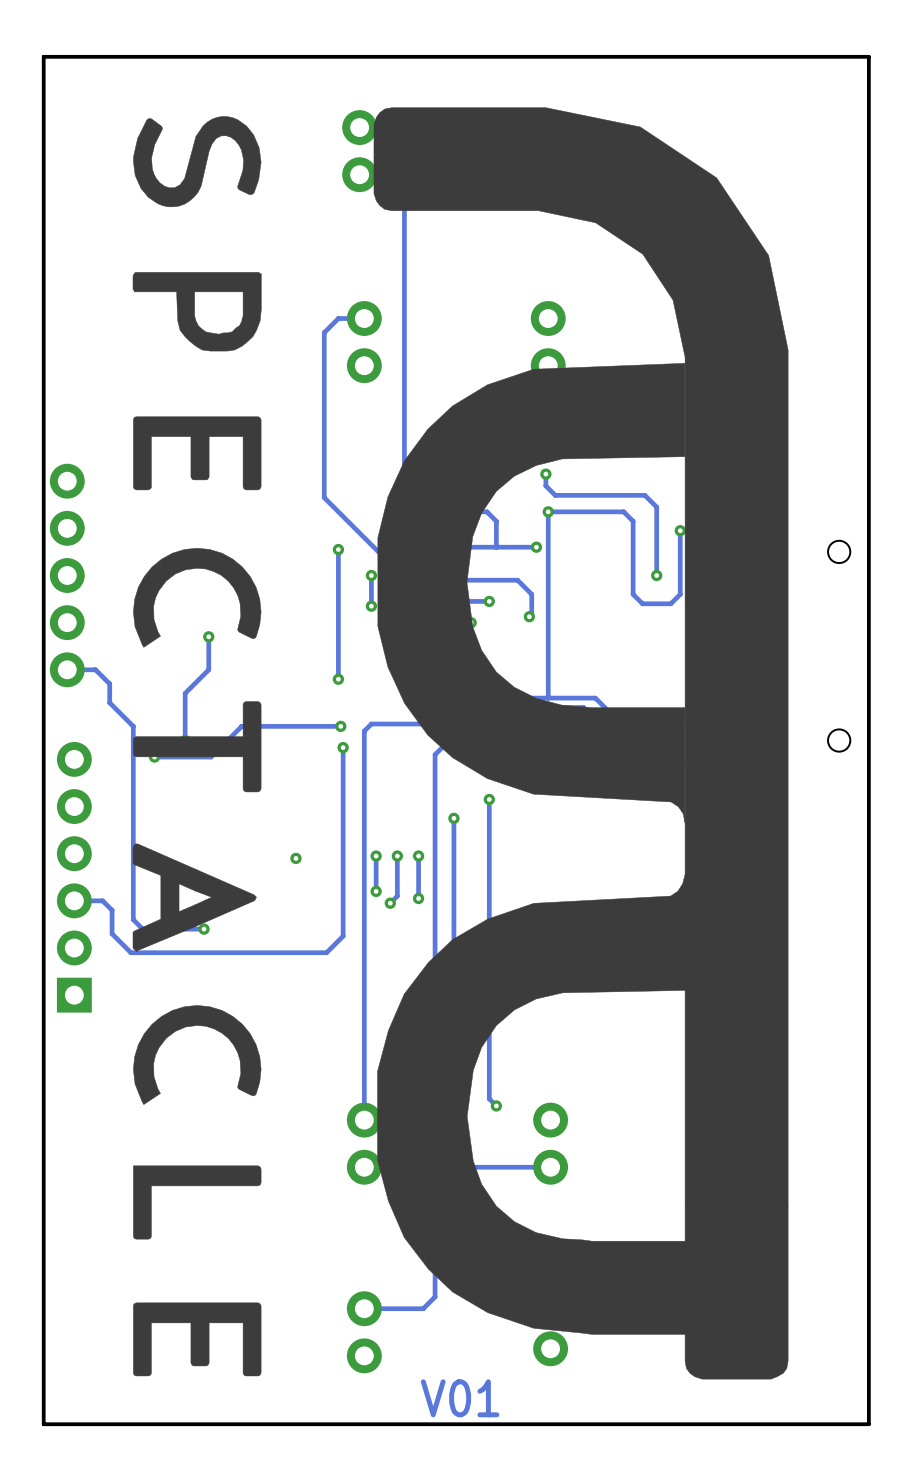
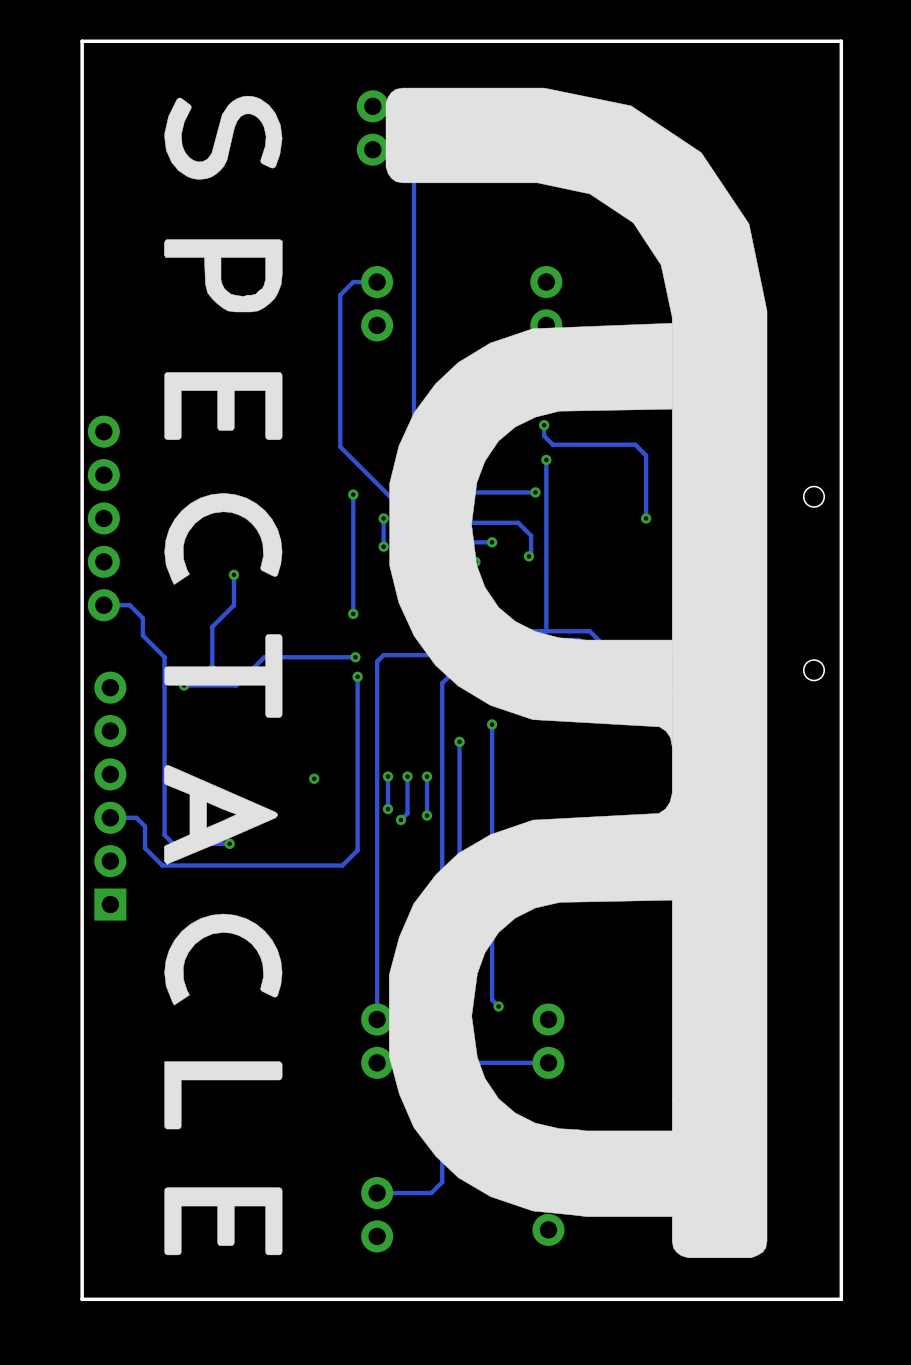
track: (475, 511) (486, 511) (496, 521) (496, 547) -> none
track: (548, 511) (623, 511) (633, 521) (633, 594) (642, 603) (670, 603) (680, 594) (680, 530) -> none
via: (680, 530) -> none
text: V01 (460, 1398) -> none

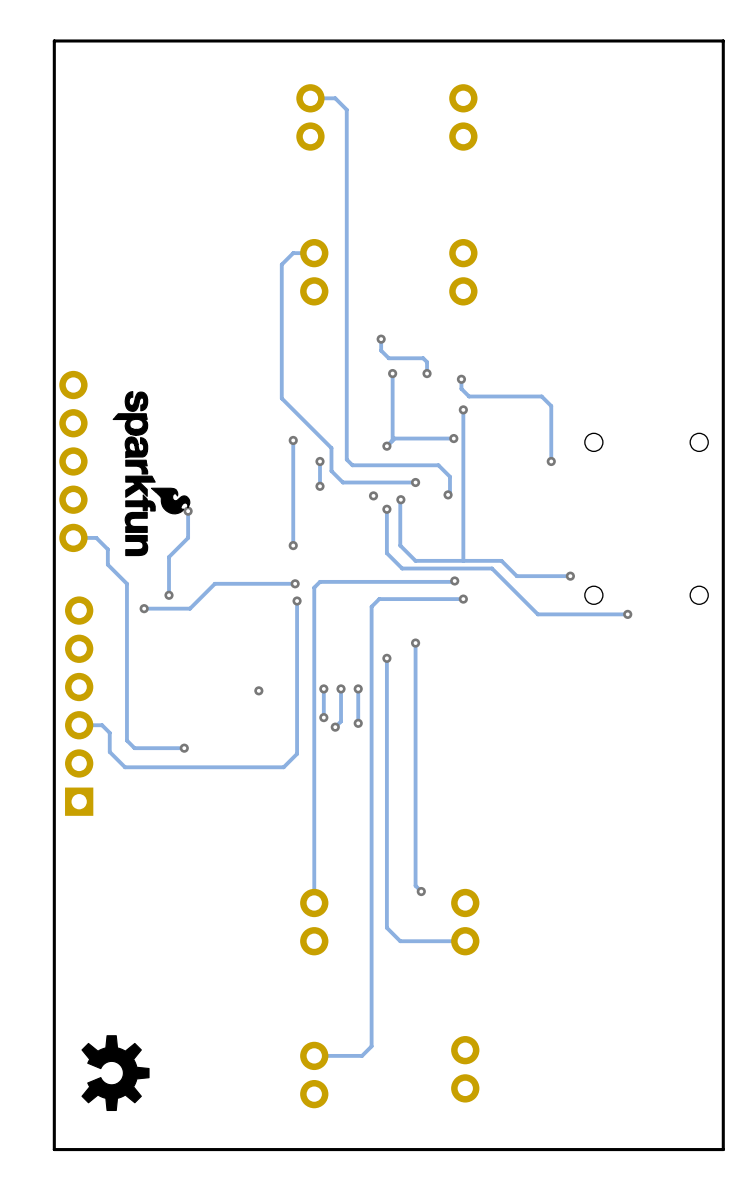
drawing: [385, 87, 768, 1259] -> none
drawing: [164, 95, 283, 180] -> none
drawing: [164, 239, 283, 313] -> none
drawing: [164, 372, 283, 440] -> none
drawing: none -> [112, 391, 191, 557]
drawing: [164, 493, 283, 585] -> none
drawing: [164, 634, 283, 718] -> none
drawing: [164, 765, 279, 865] -> none
drawing: [164, 913, 283, 1006] -> none
drawing: [164, 1061, 283, 1130] -> none
drawing: none -> [81, 1035, 150, 1112]
drawing: [164, 1187, 283, 1256] -> none

